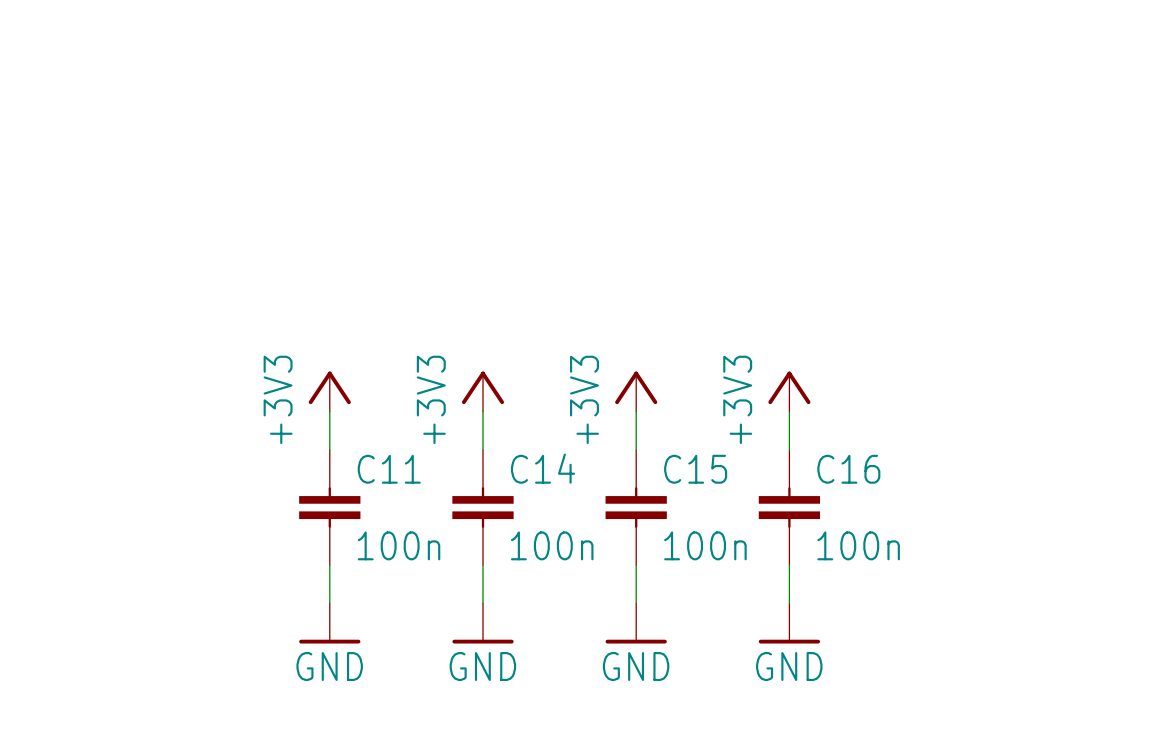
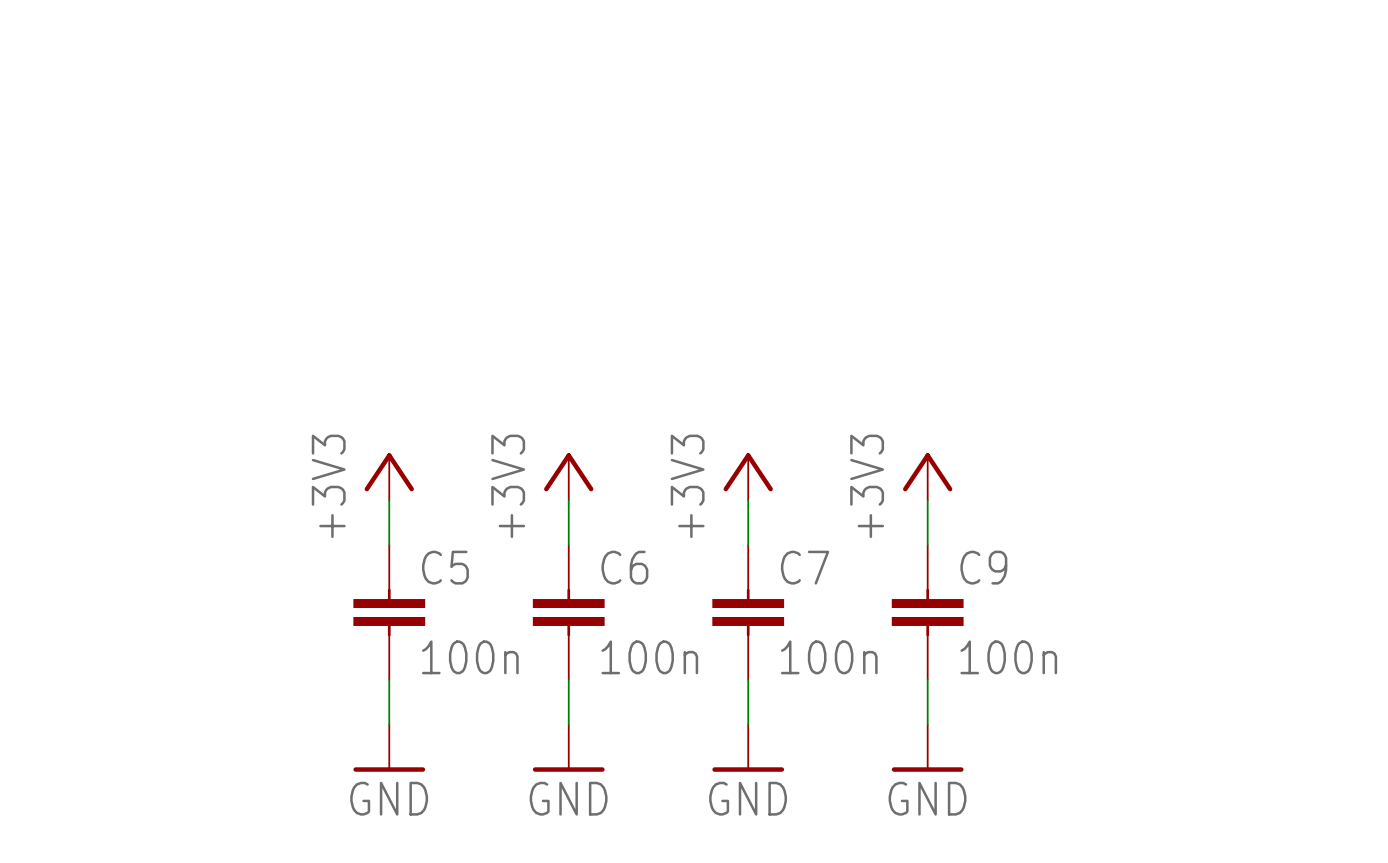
C14 name: C14 (543, 468) -> C6 (624, 567)
C11 name: C11 (389, 469) -> C5 (445, 567)
C15 name: C15 (695, 469) -> C7 (805, 567)
C16 name: C16 (848, 469) -> C9 (983, 567)

